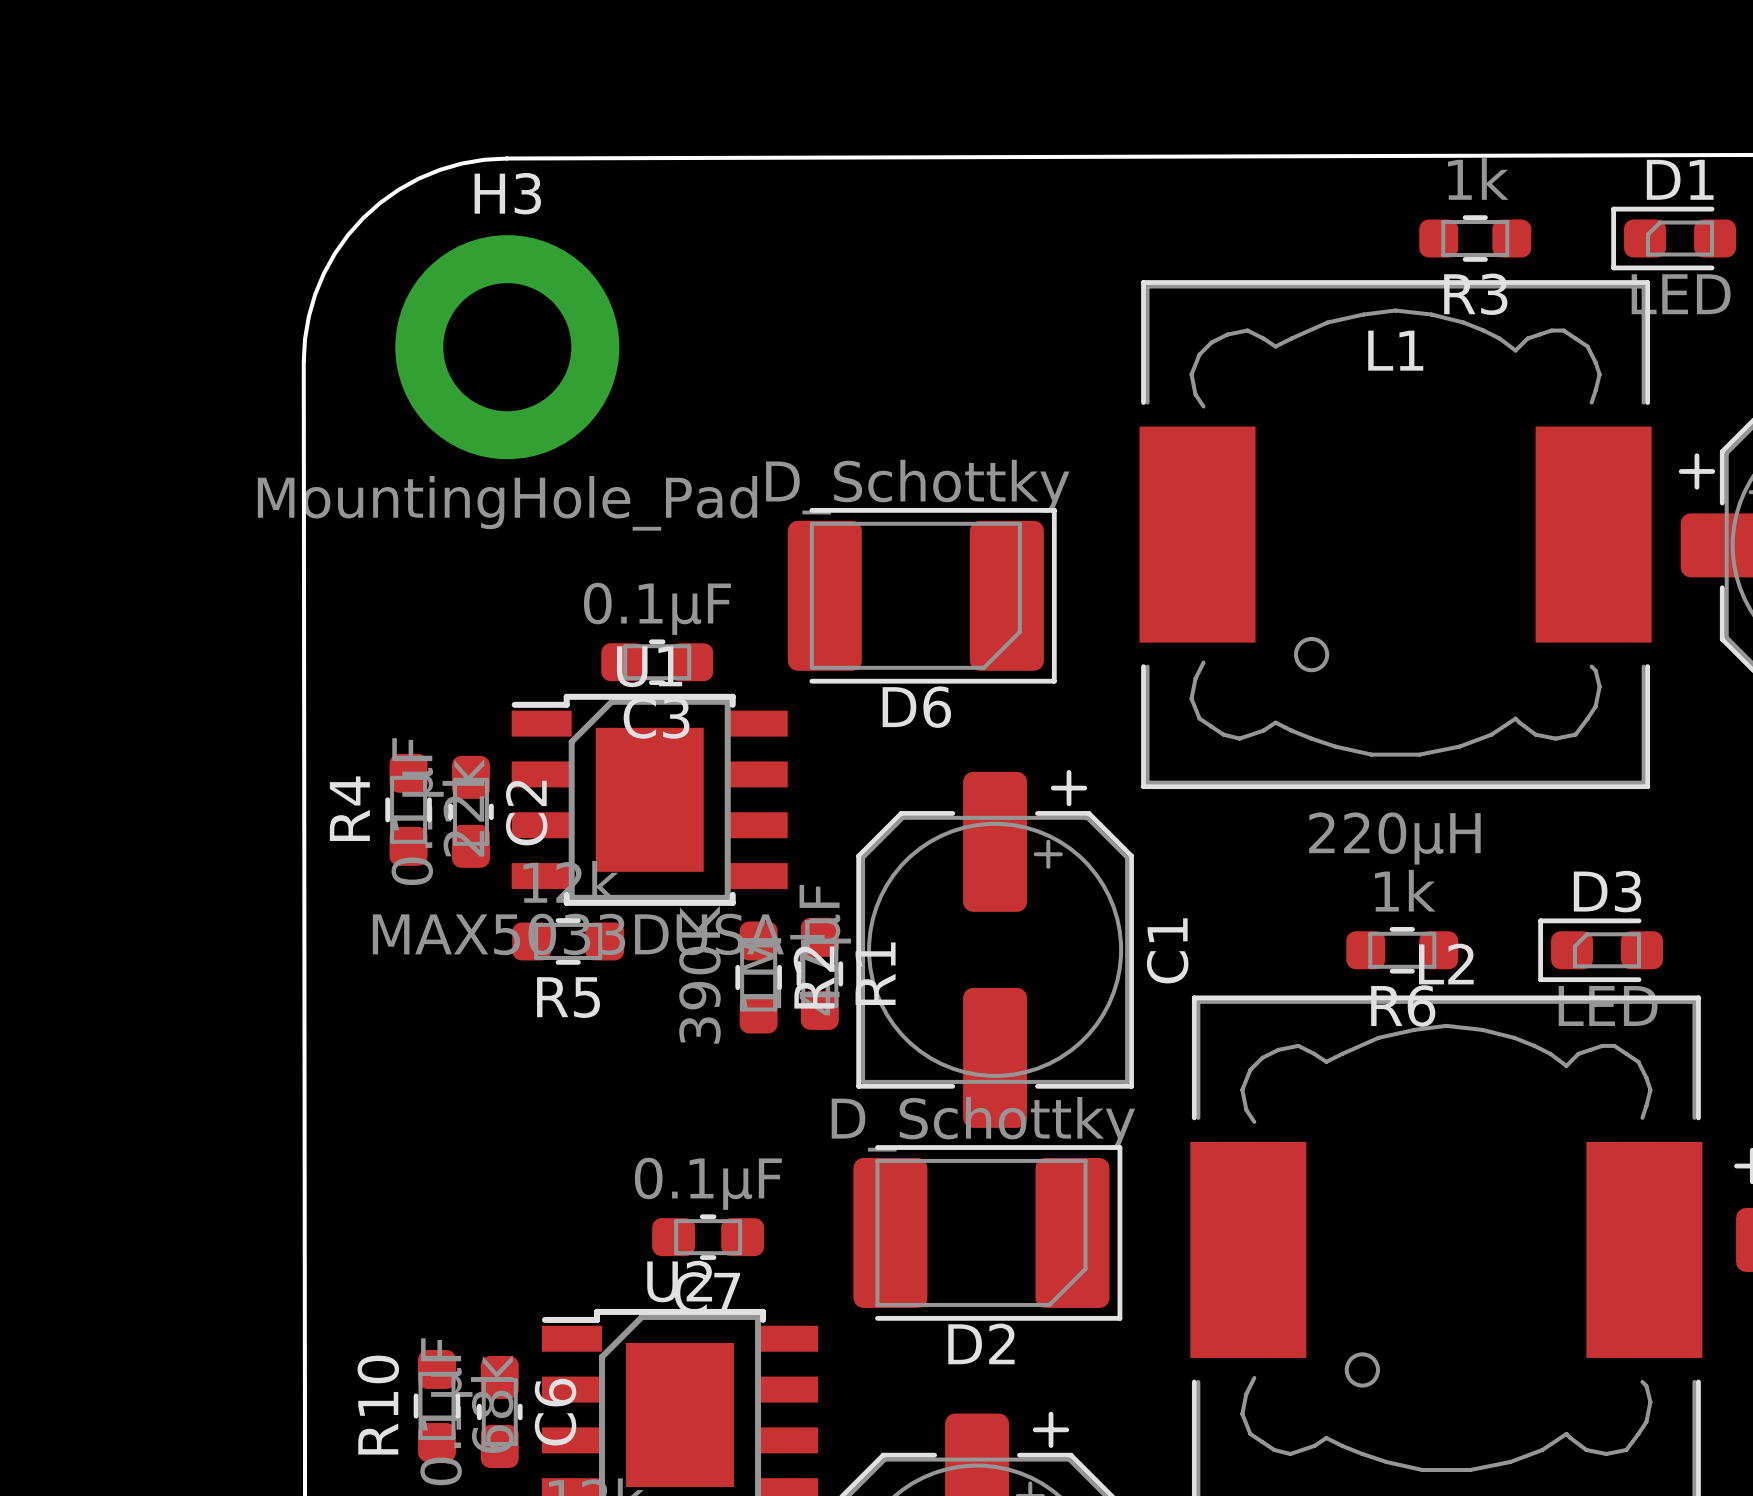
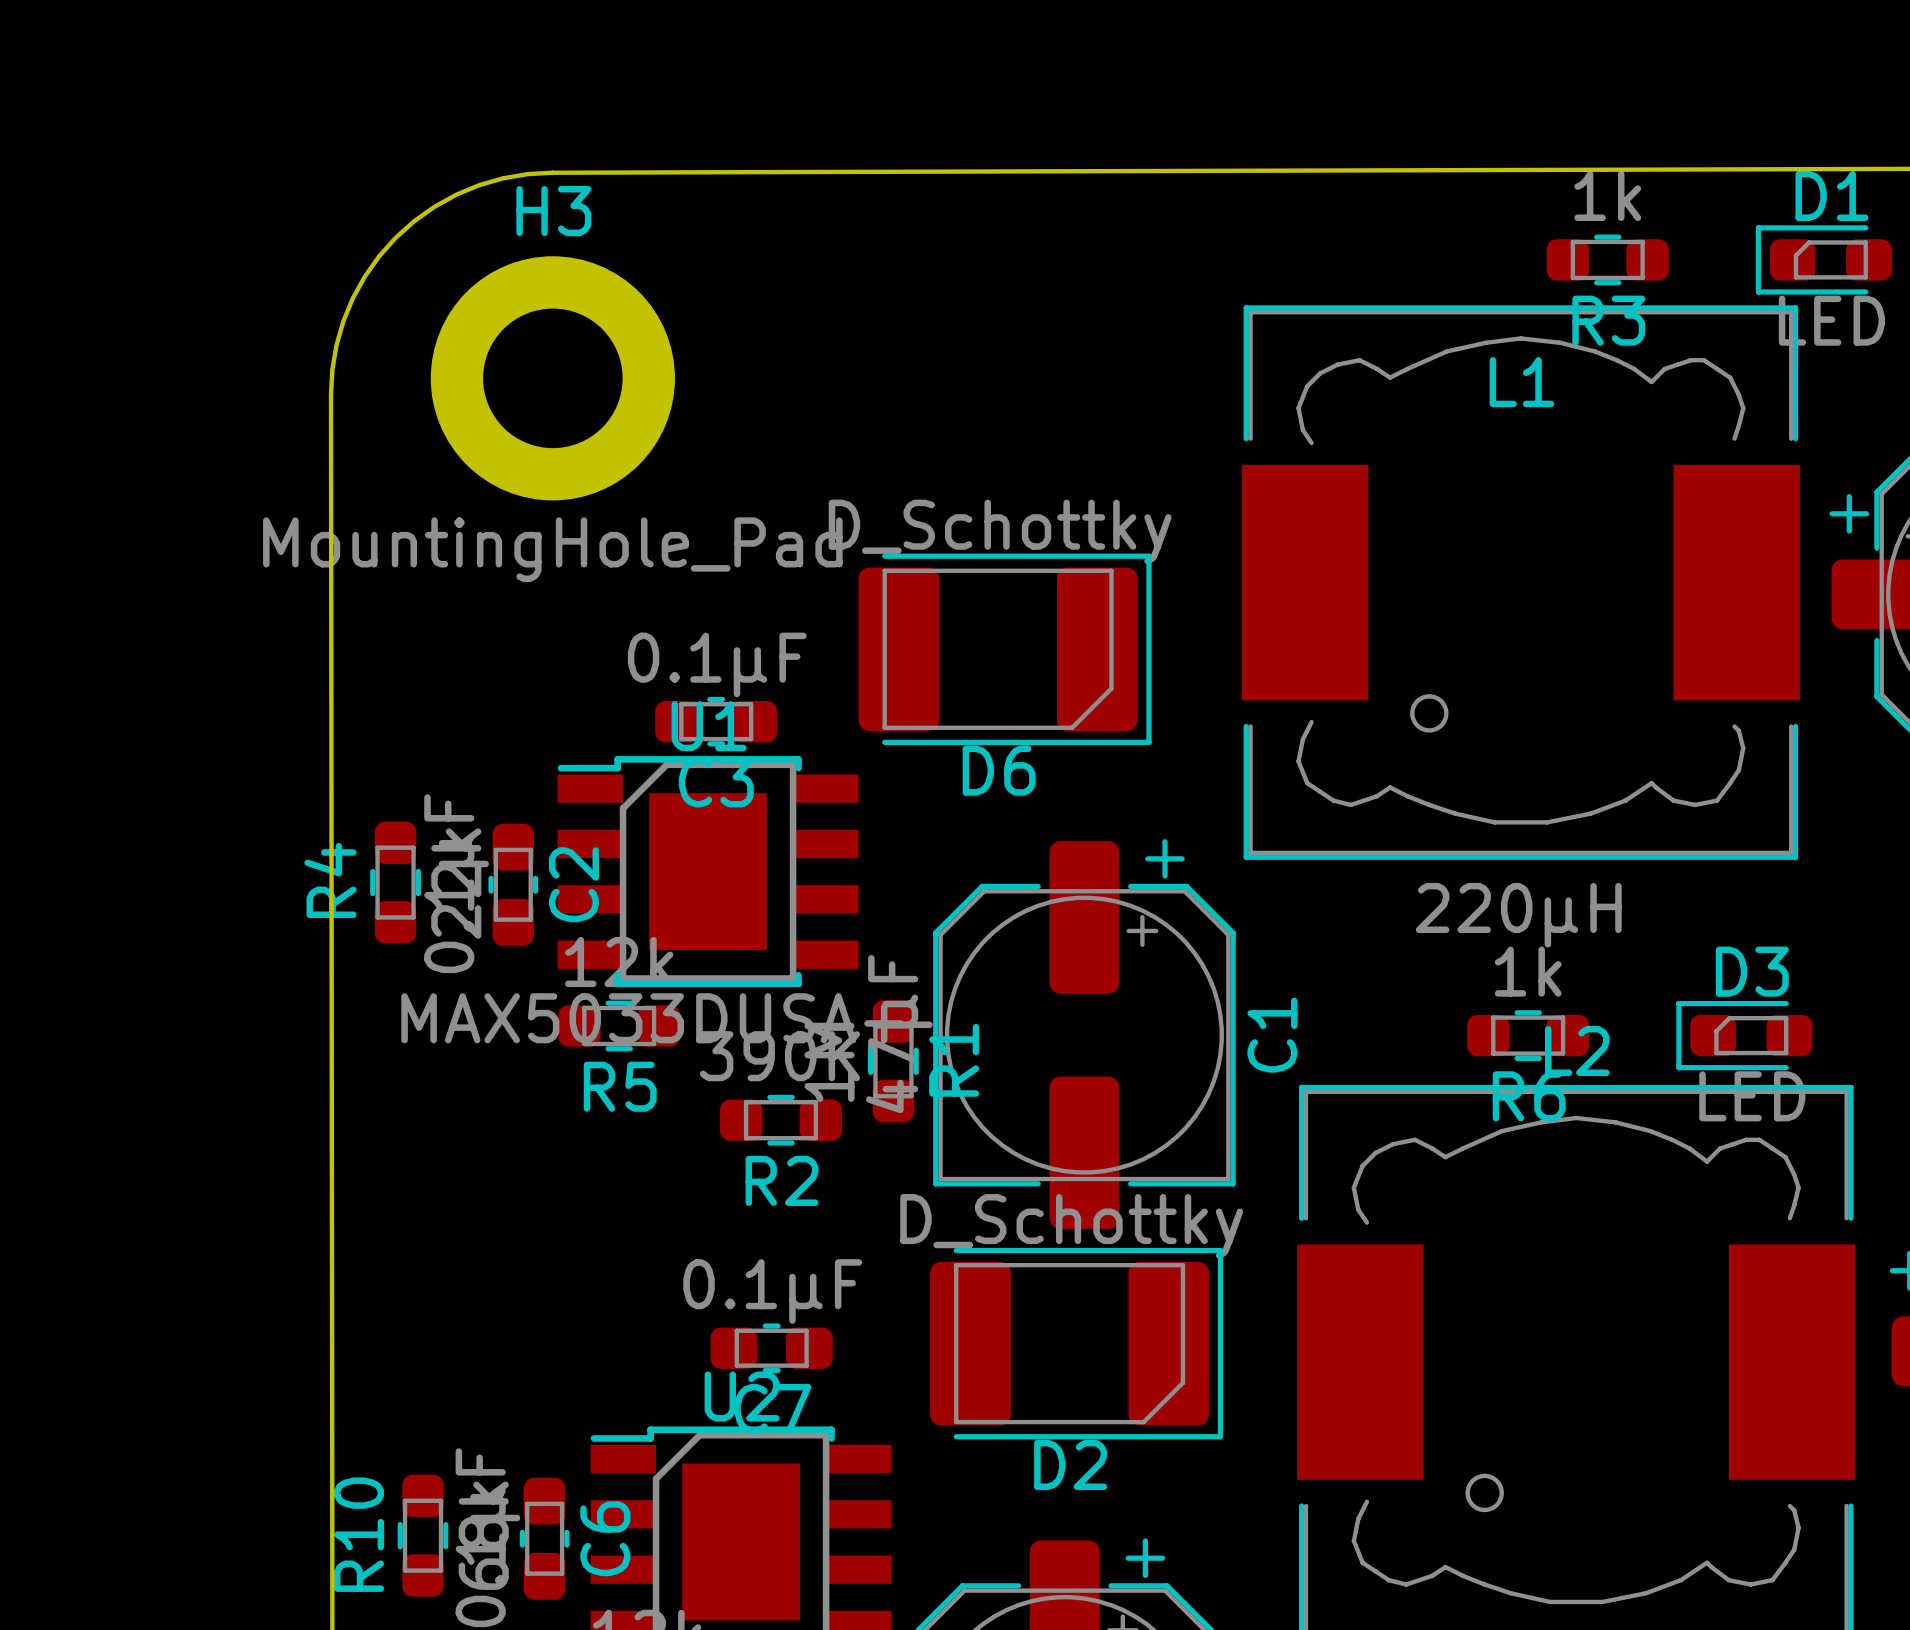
R4 position: (408, 809) -> (395, 882)
R2 rotation: 0° (758, 977) -> 90° clockwise (780, 1120)
R10 position: (436, 1405) -> (423, 1535)

